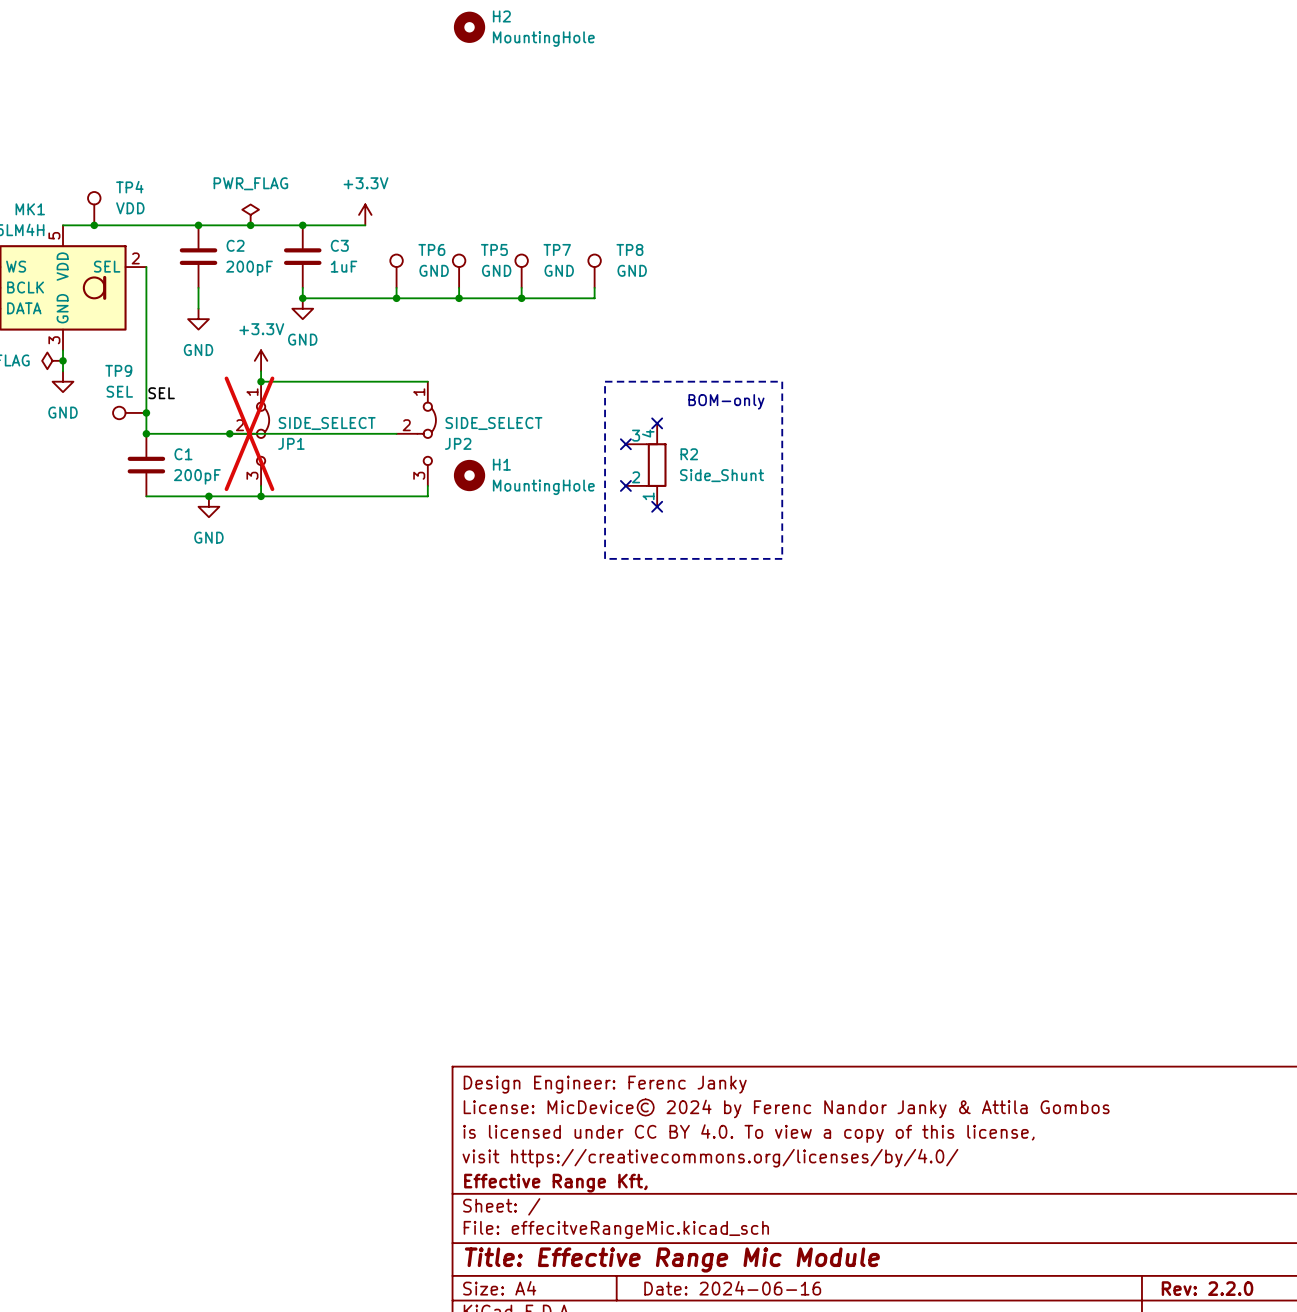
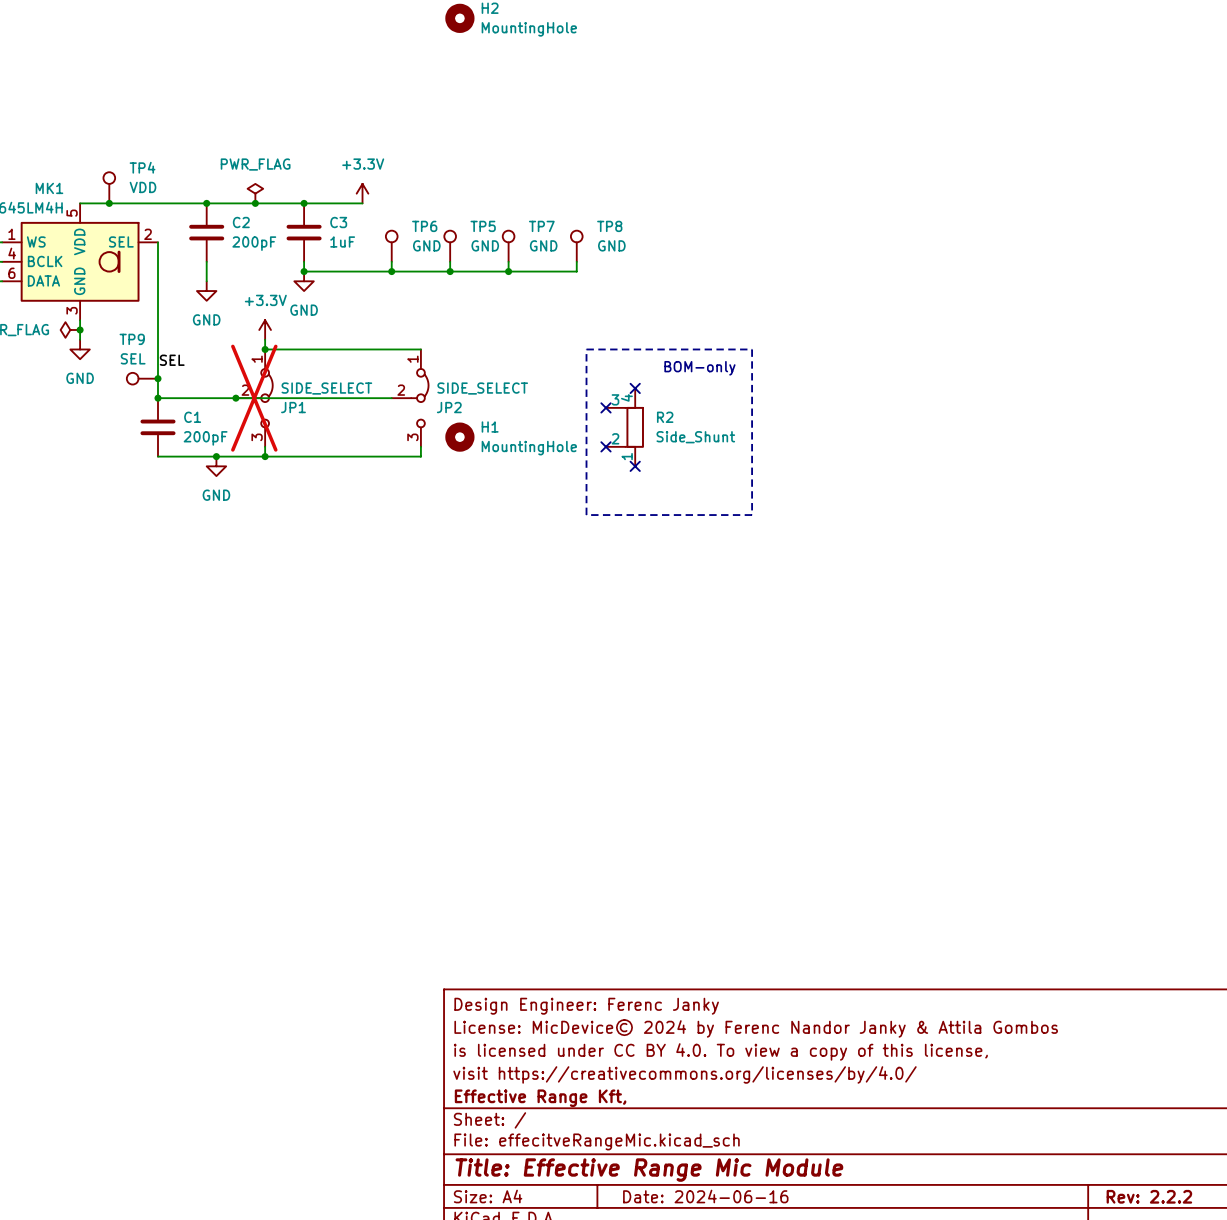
title block: Rev: 2.2.0 (1207, 1288) -> Rev: 2.2.2 (1149, 1196)

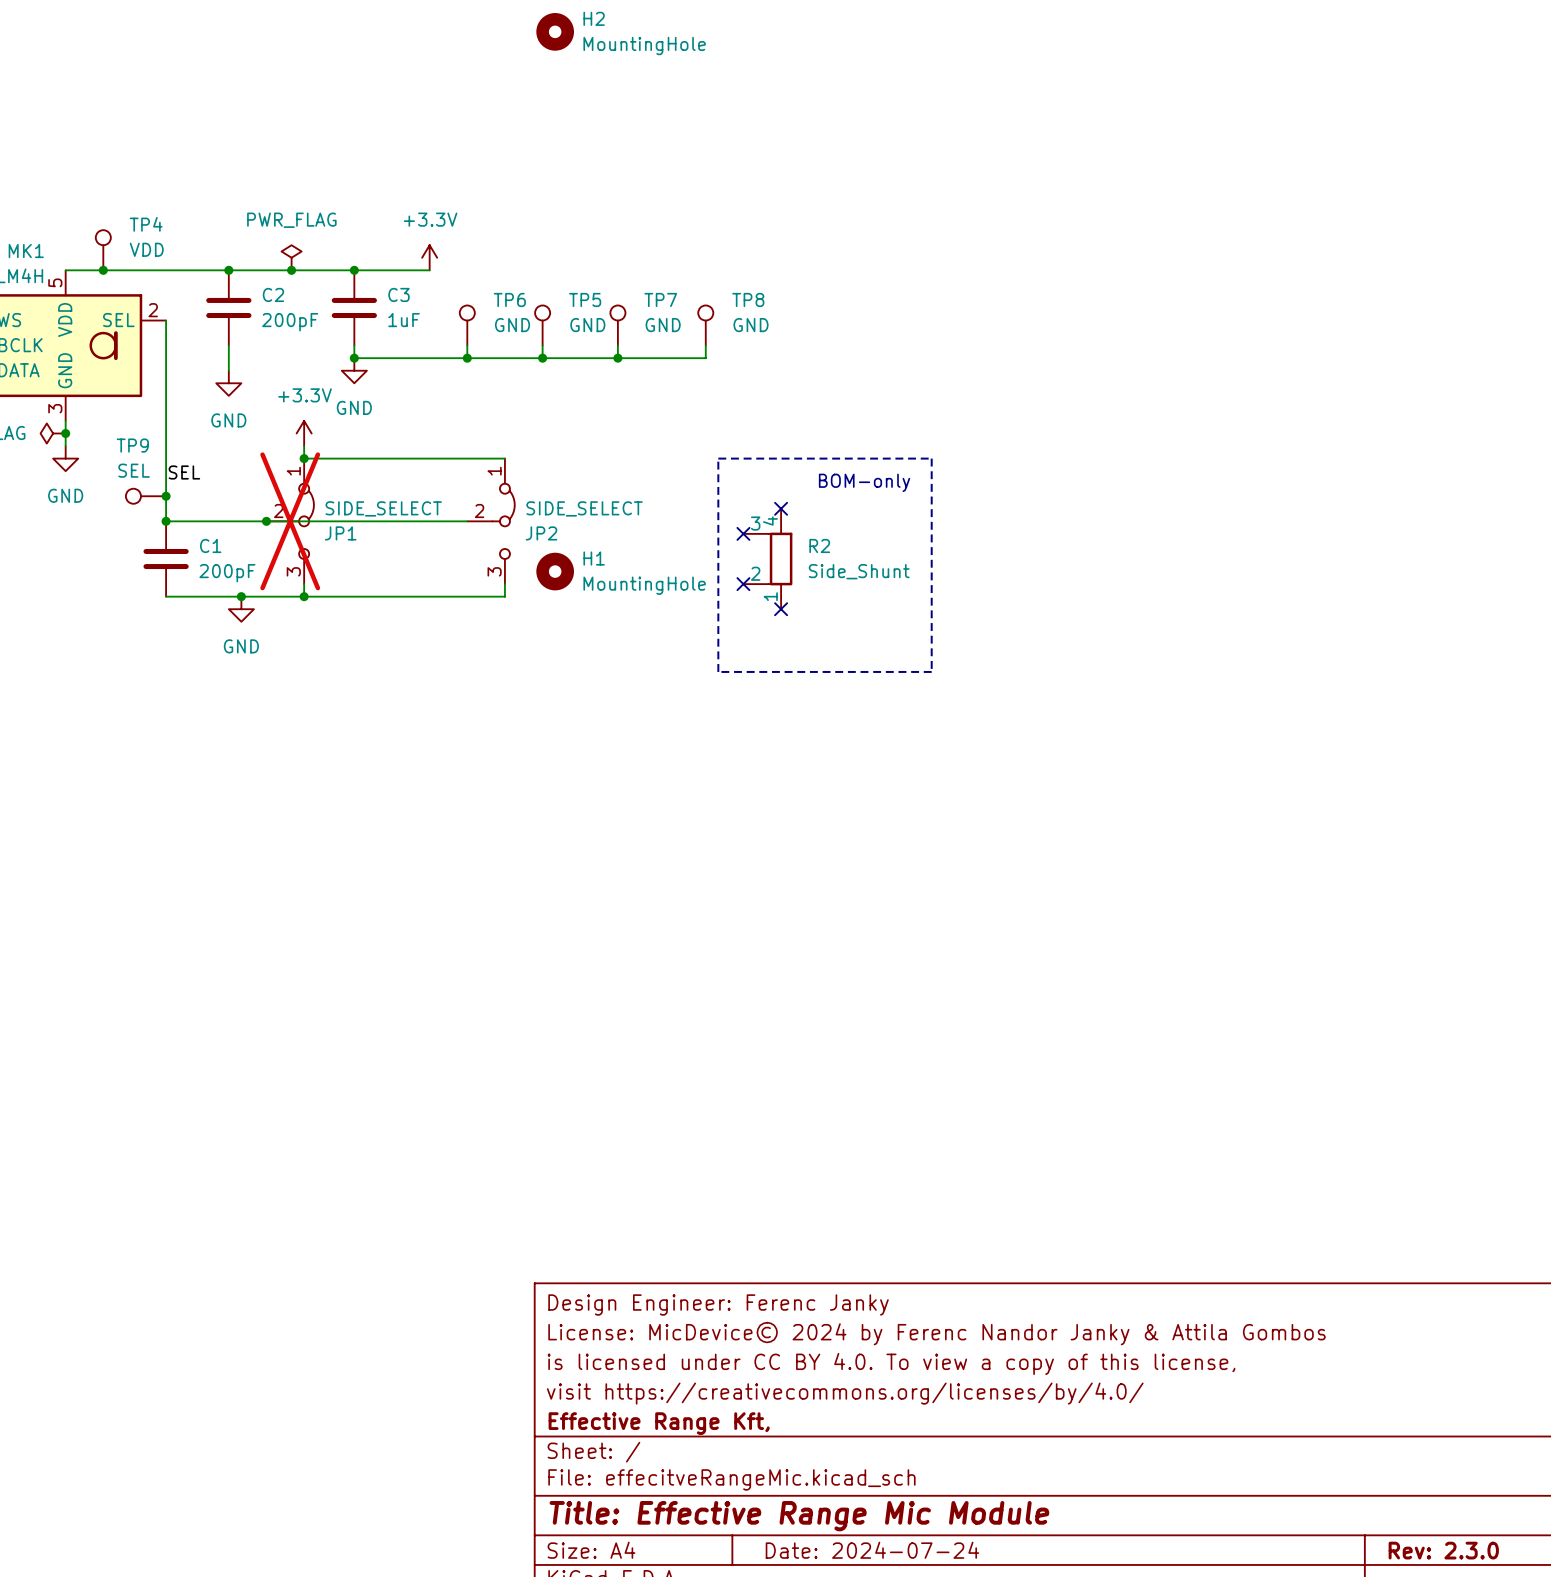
title block: Date: 2024-06-16 (705, 1196) -> Date: 2024-07-24 (872, 1550)
title block: Rev: 2.2.2 (1149, 1196) -> Rev: 2.3.0 (1443, 1550)

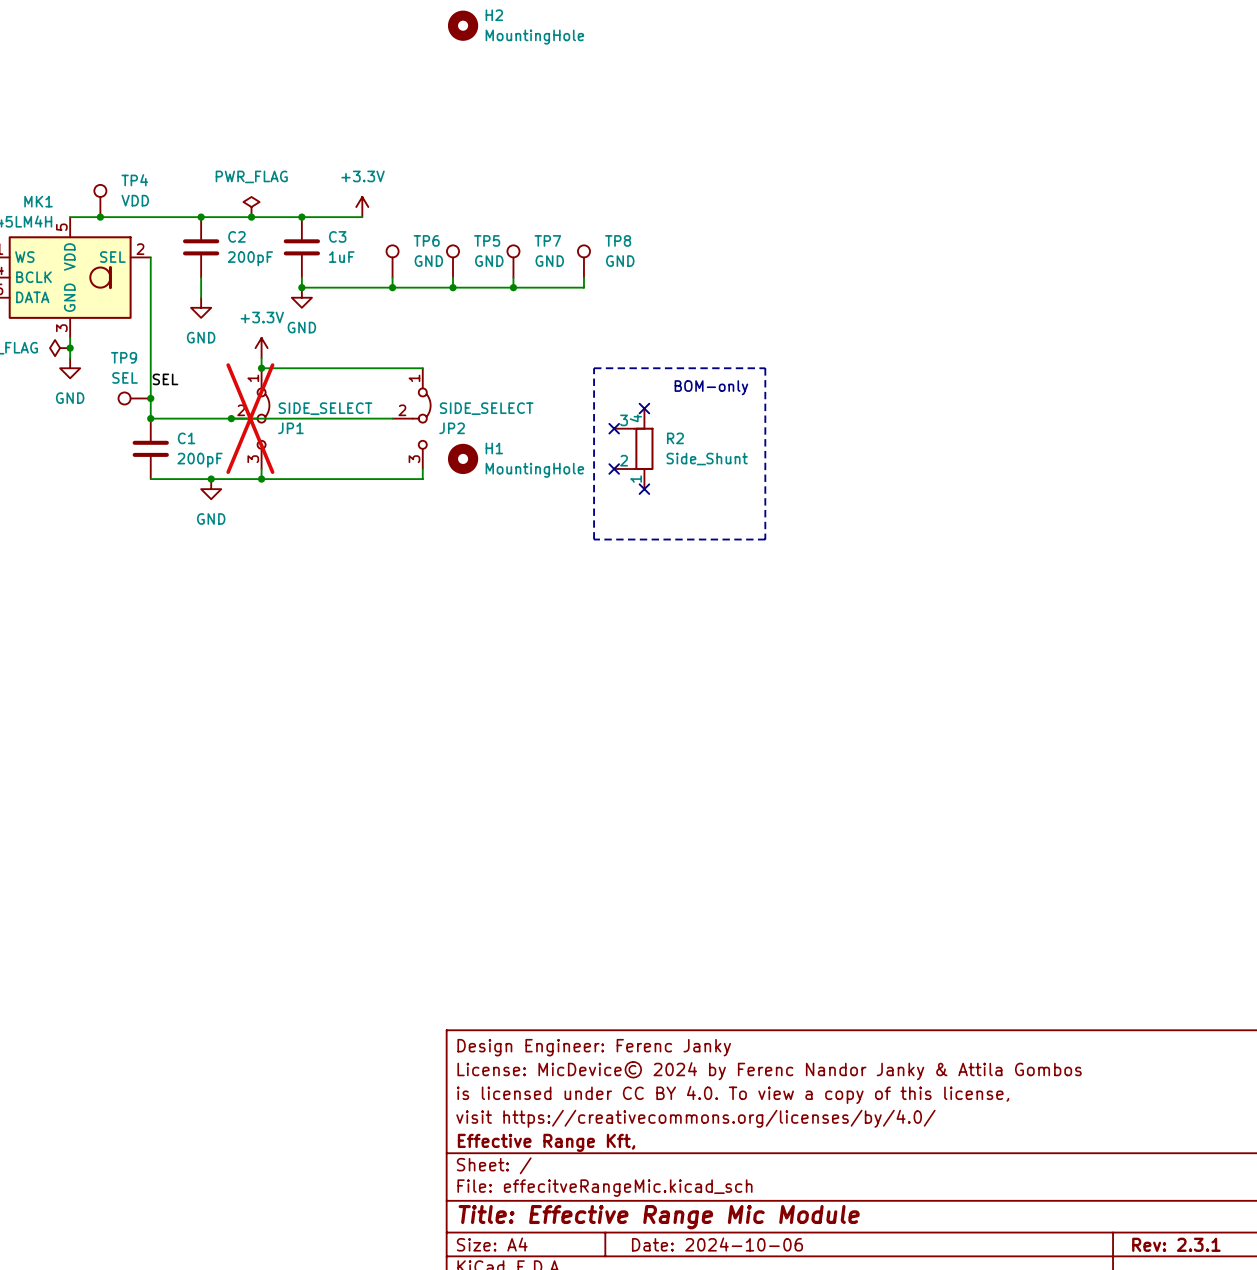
title block: Date: 2024-07-24 (872, 1550) -> Date: 2024-10-06 (717, 1244)
title block: Rev: 2.3.0 (1443, 1550) -> Rev: 2.3.1 (1176, 1244)

